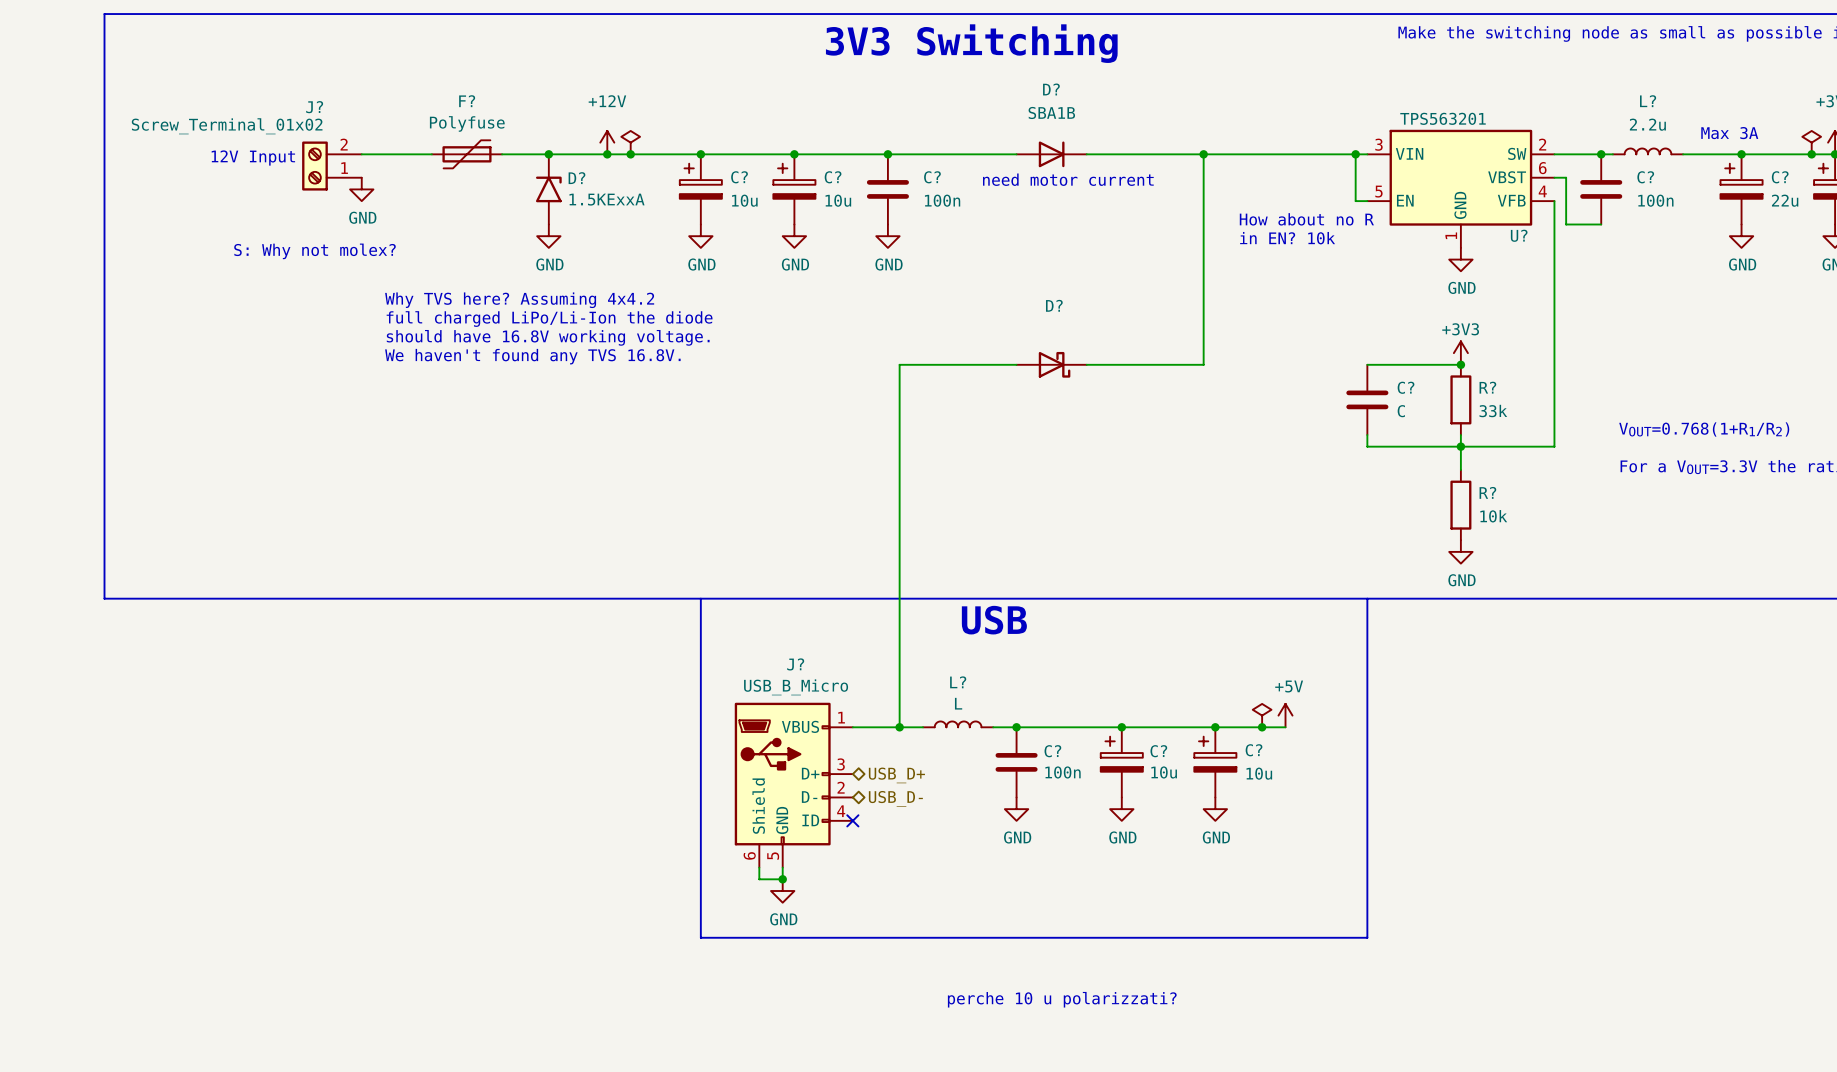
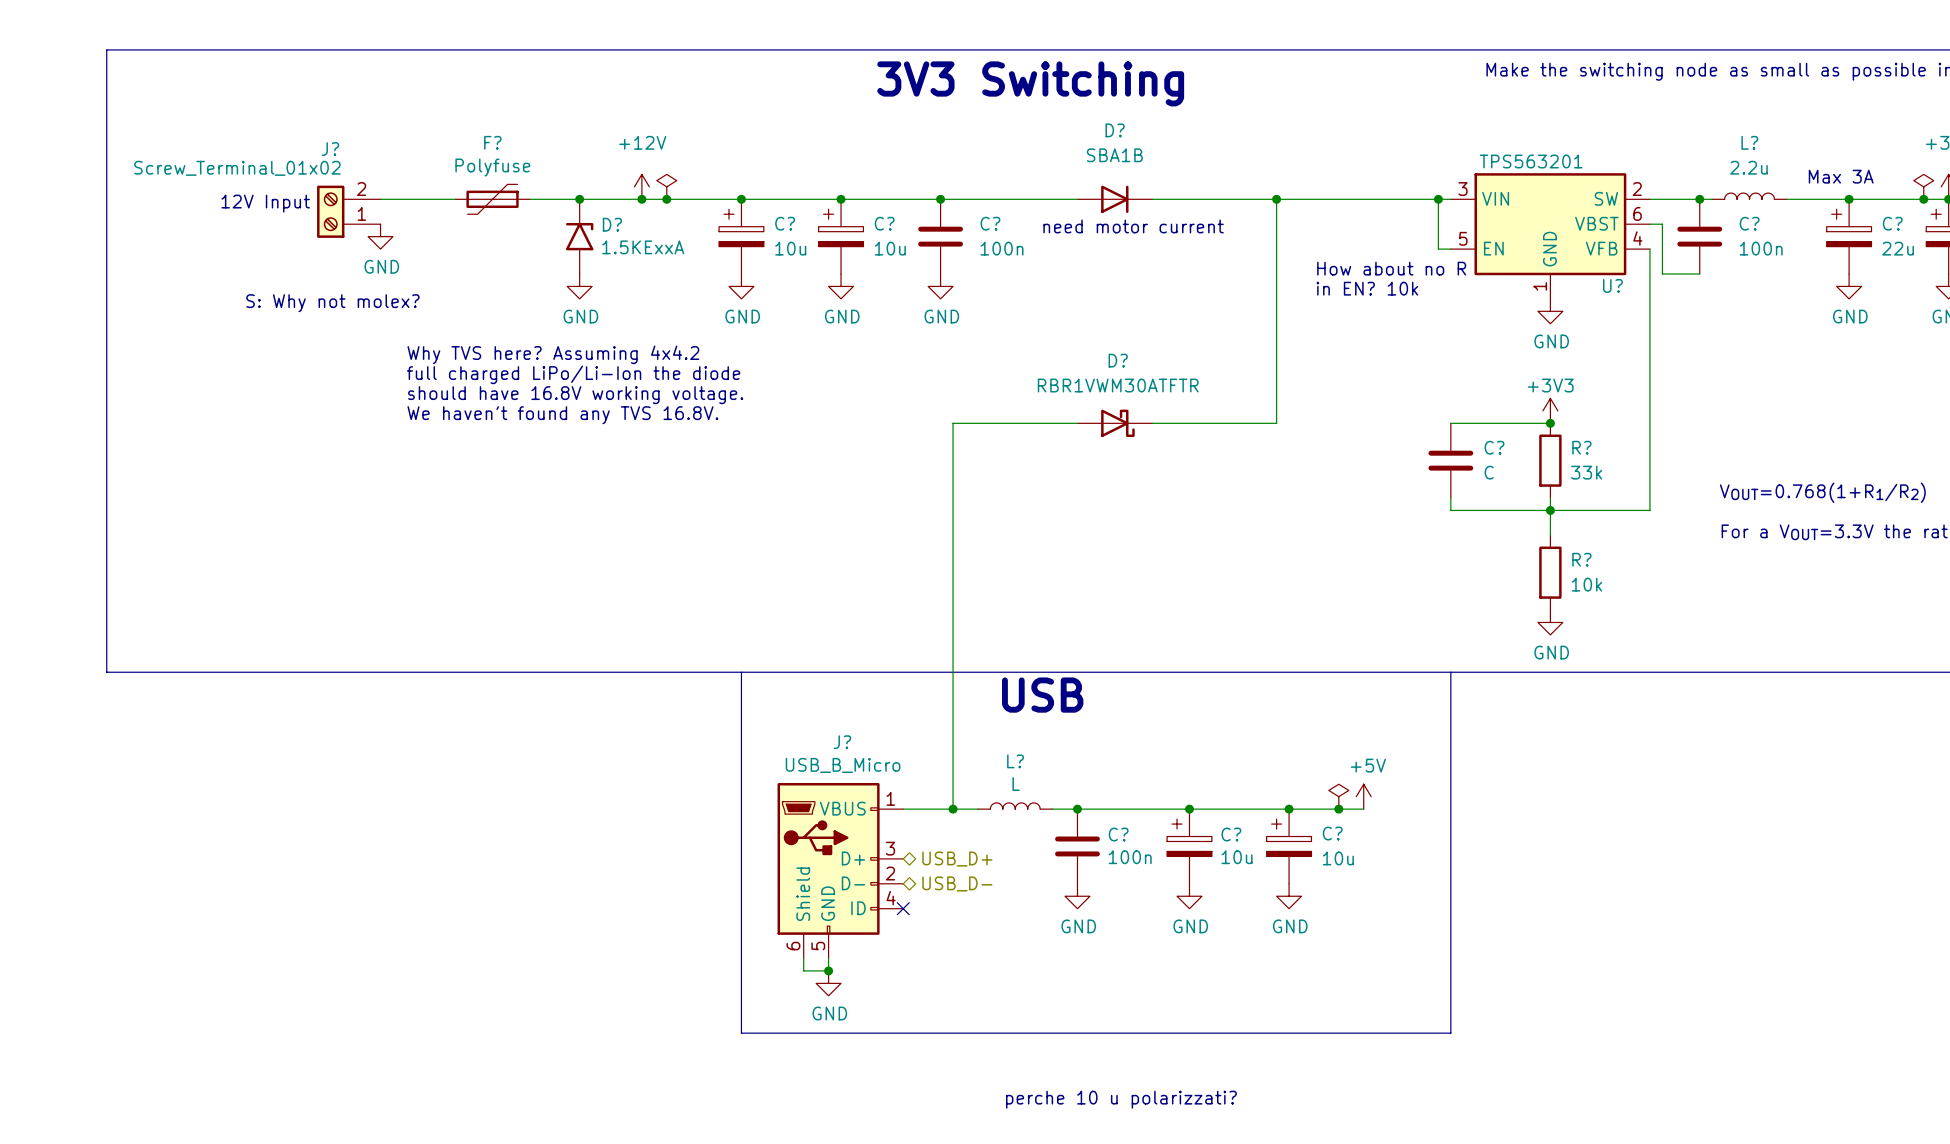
D? value: none -> RBR1VWM30ATFTR (1118, 385)

